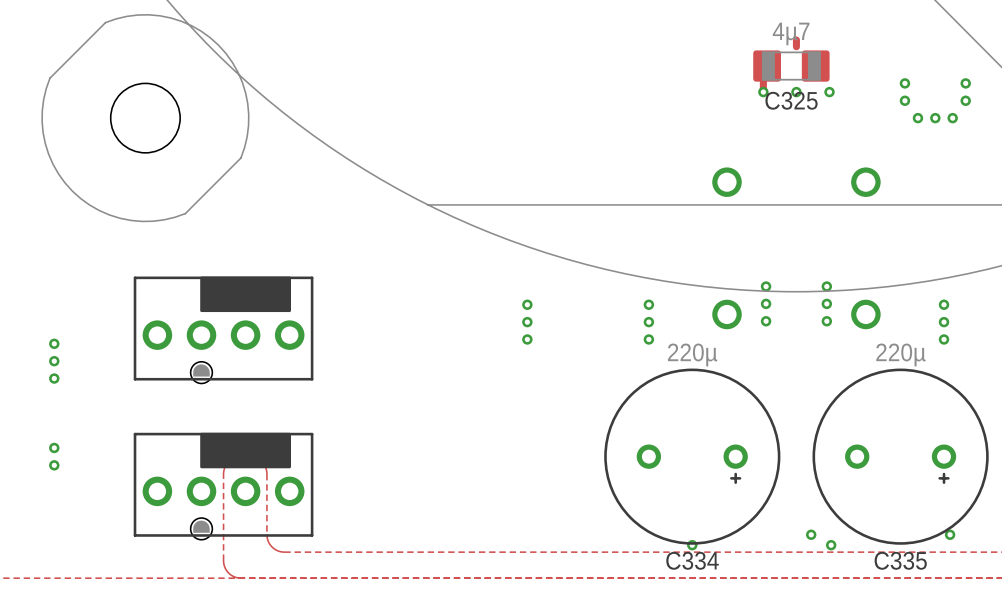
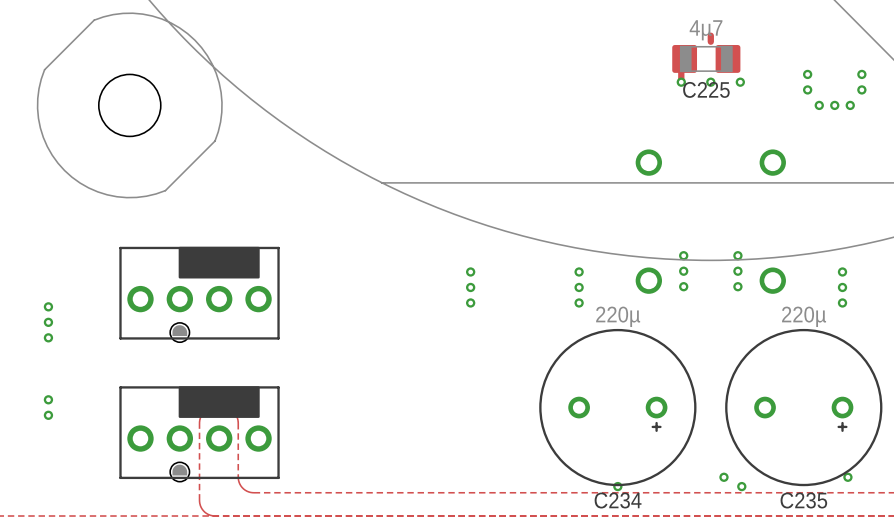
C325 name: C325 (791, 100) -> C225 (706, 89)
C334 name: C334 (692, 560) -> C234 (618, 500)
C335 name: C335 (900, 560) -> C235 (803, 500)

